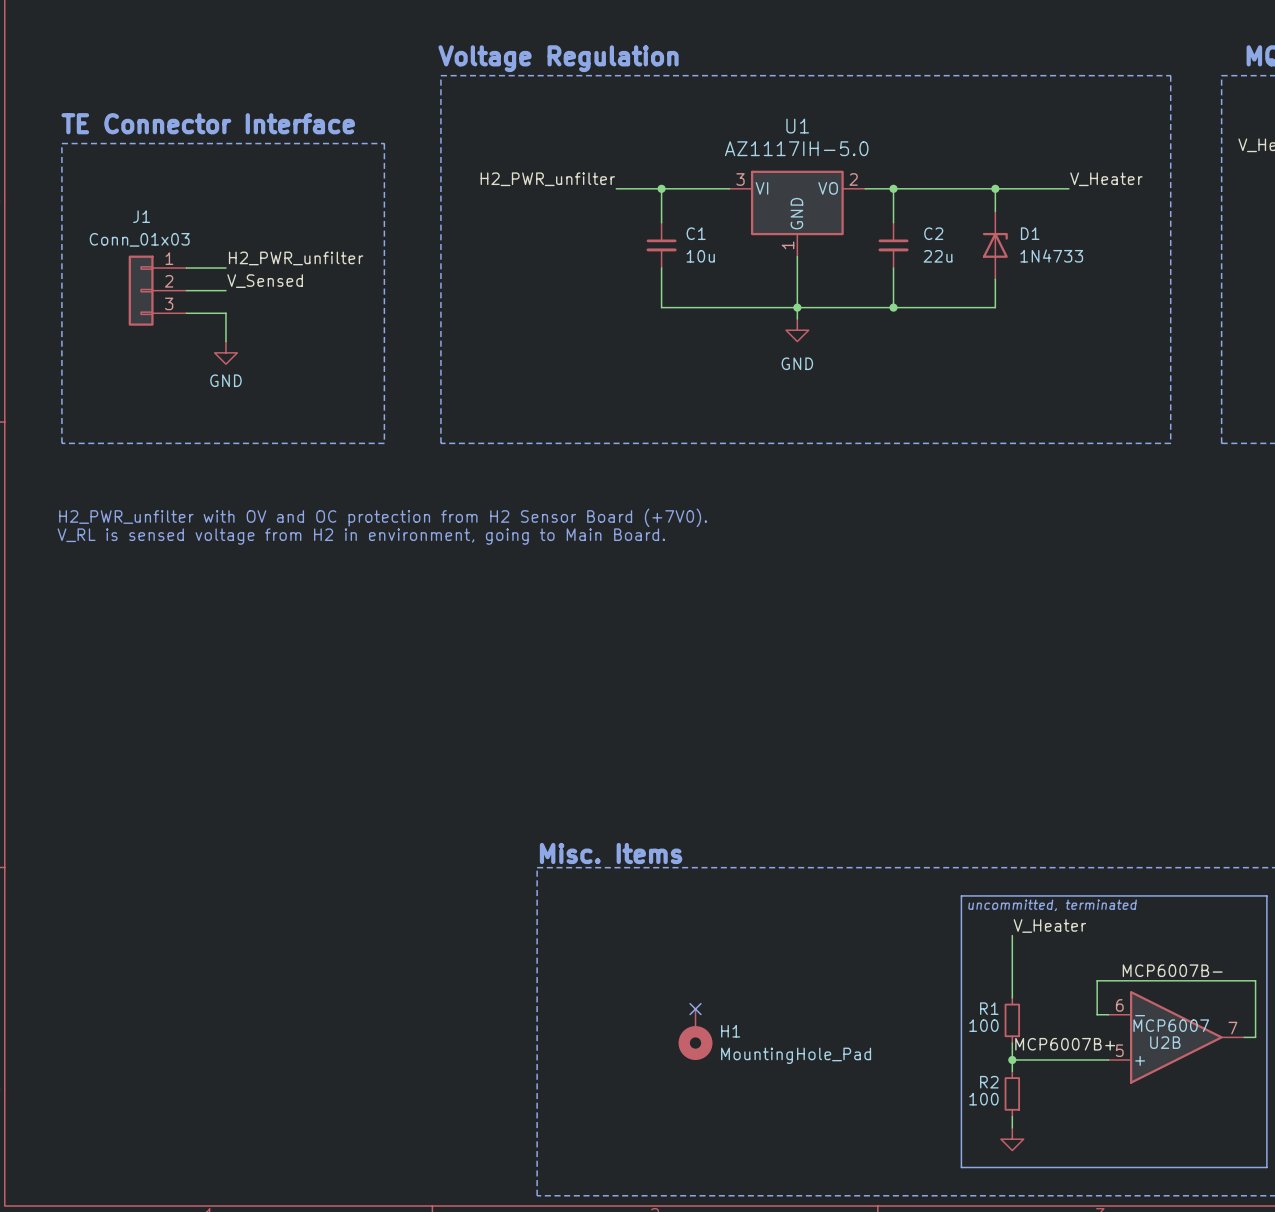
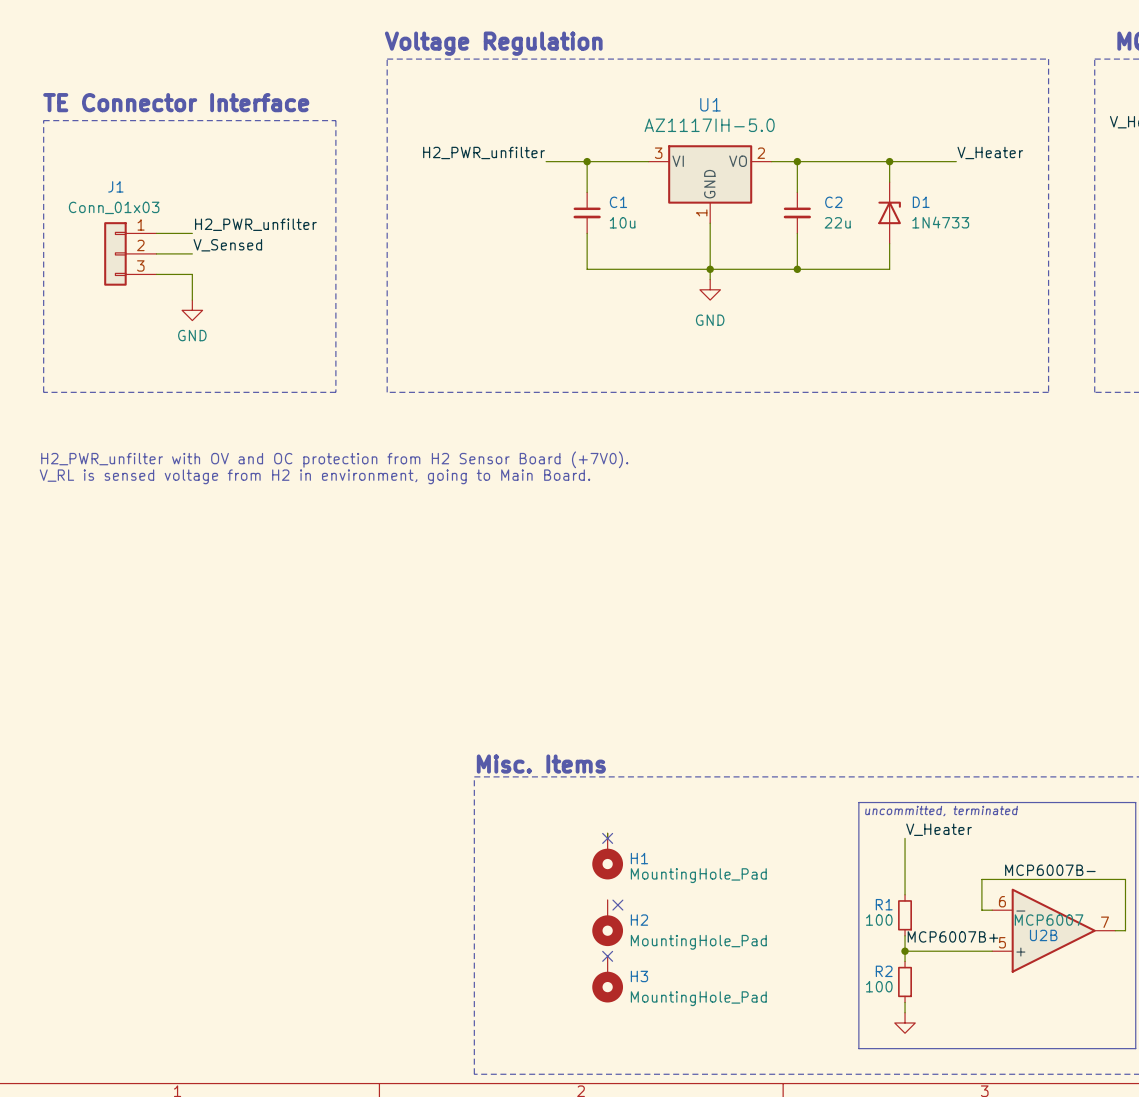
wire: none -> (607, 833) (607, 838)
no-connect mark: none -> (607, 838)
H2: none -> MountingHole_Pad (607, 923)
H1 name position: H1 (730, 1031) -> H1 (639, 858)
H1 position: (695, 1034) -> (607, 856)
no-connect mark: none -> (607, 956)
H3: none -> MountingHole_Pad (607, 979)

